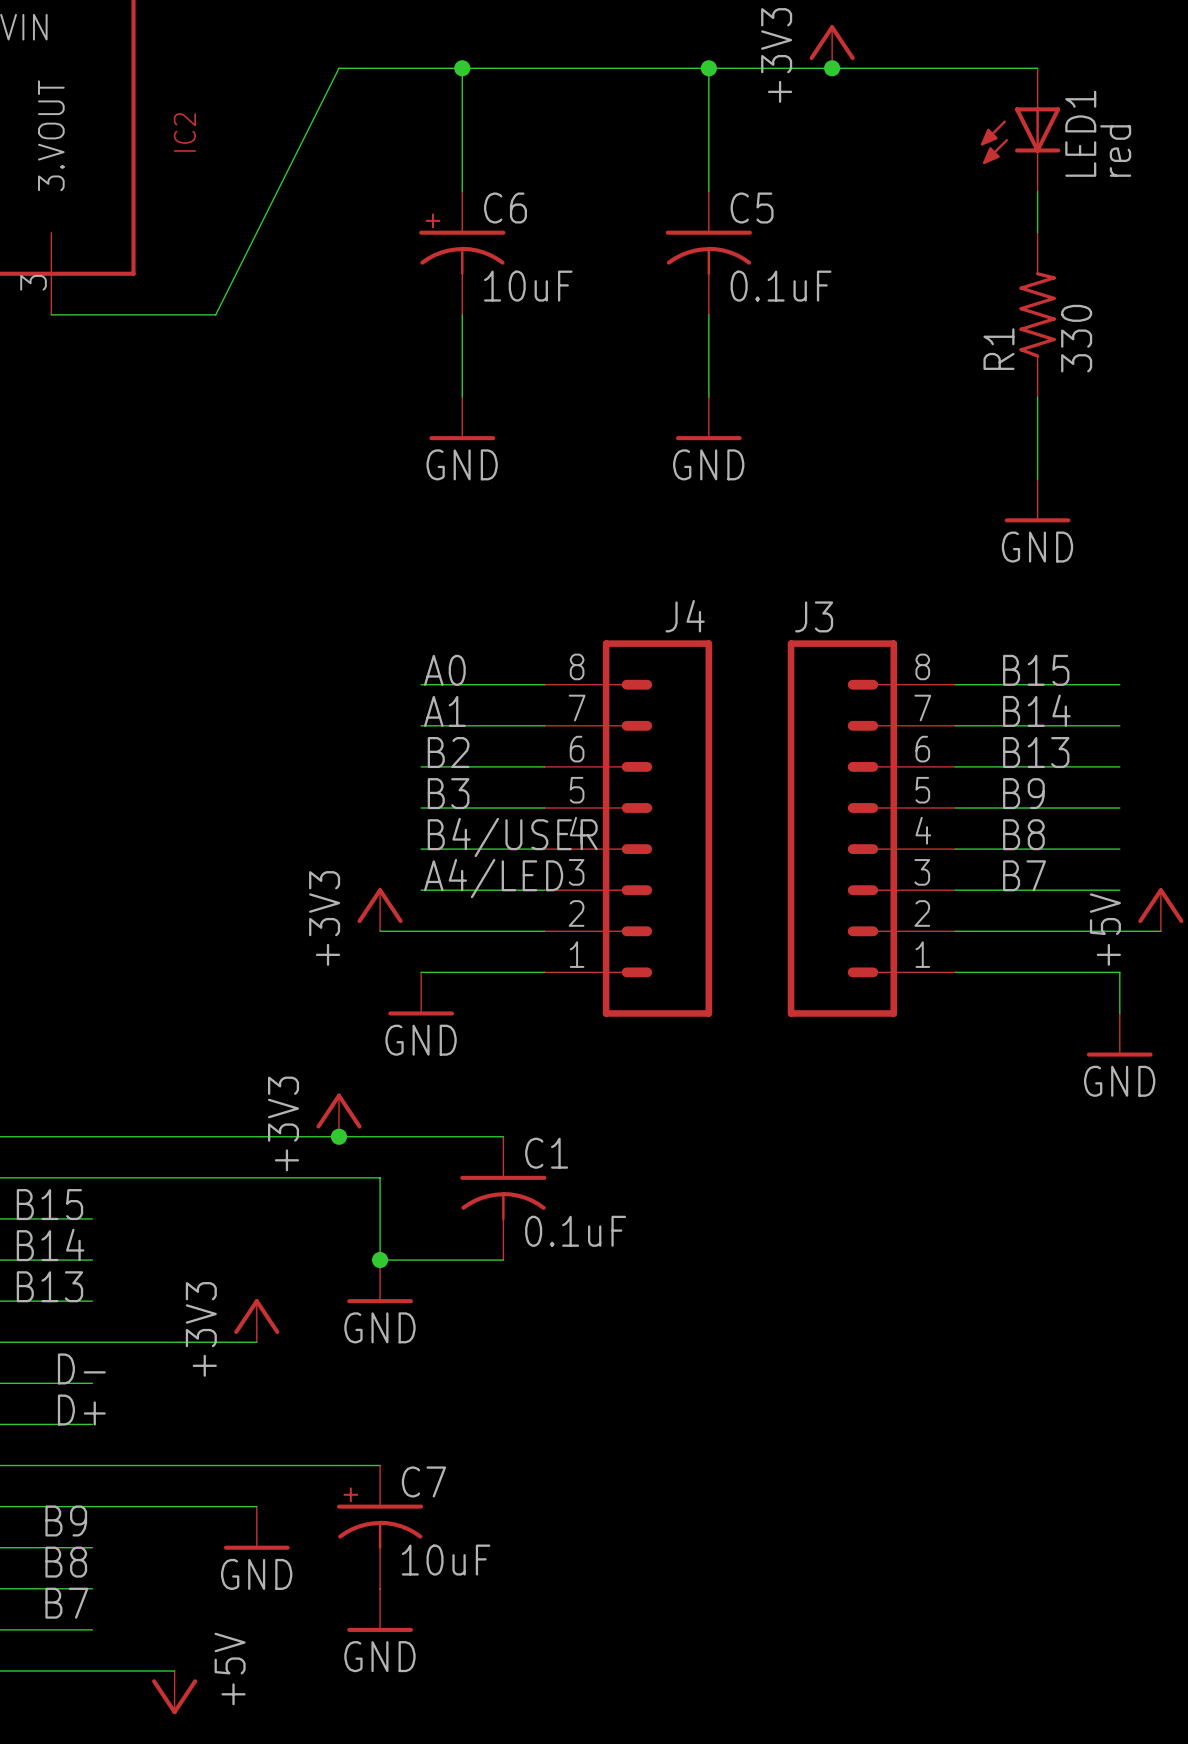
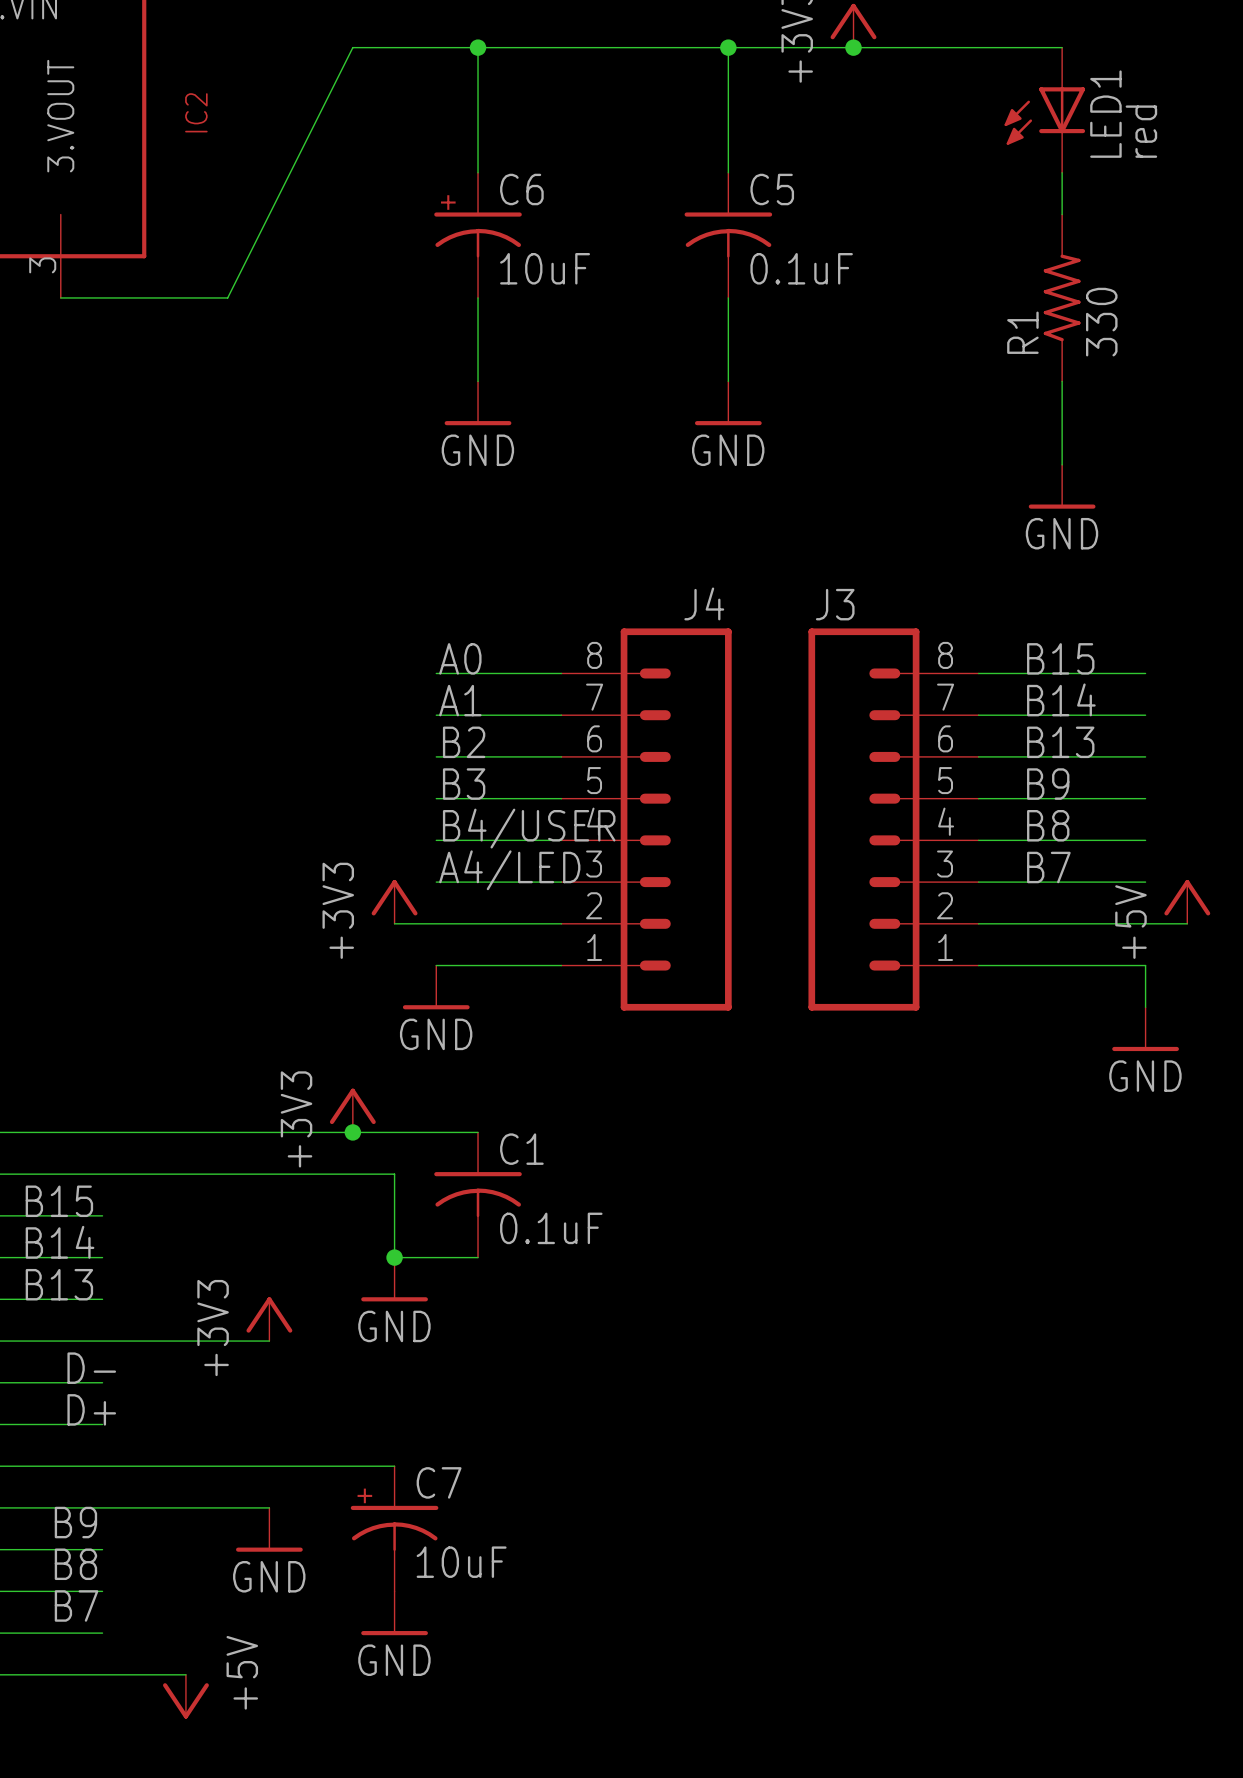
wire: (462, 1136) (503, 1136) -> none
C1 position: (503, 1198) -> (478, 1195)
wire: (462, 1260) (503, 1260) -> none

